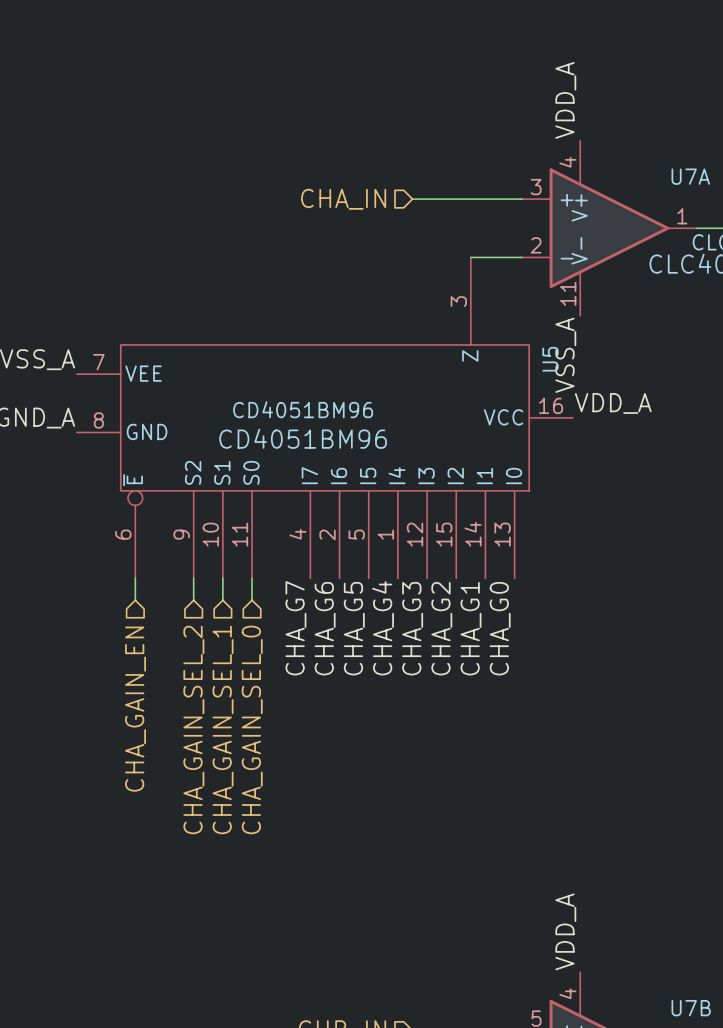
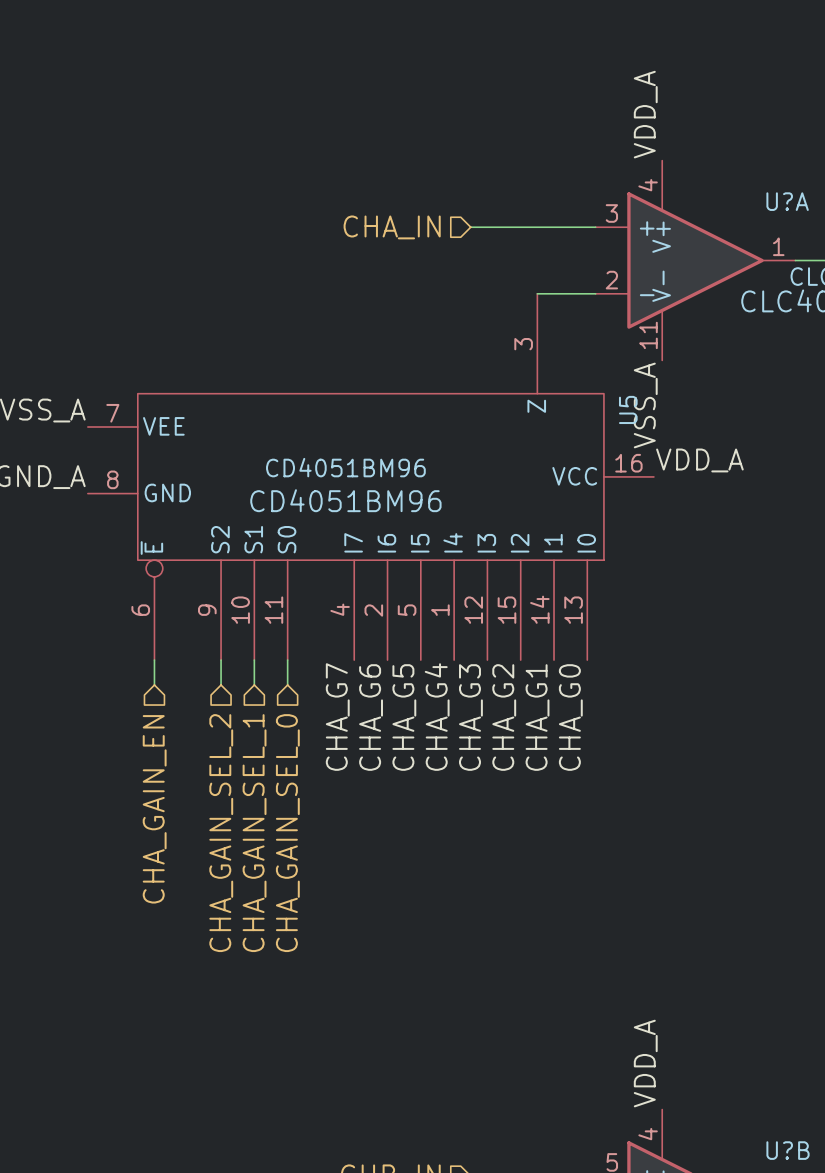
U7A name: U7A (690, 176) -> U?A (787, 201)
U7B name: U7B (691, 1008) -> U?B (788, 1150)

